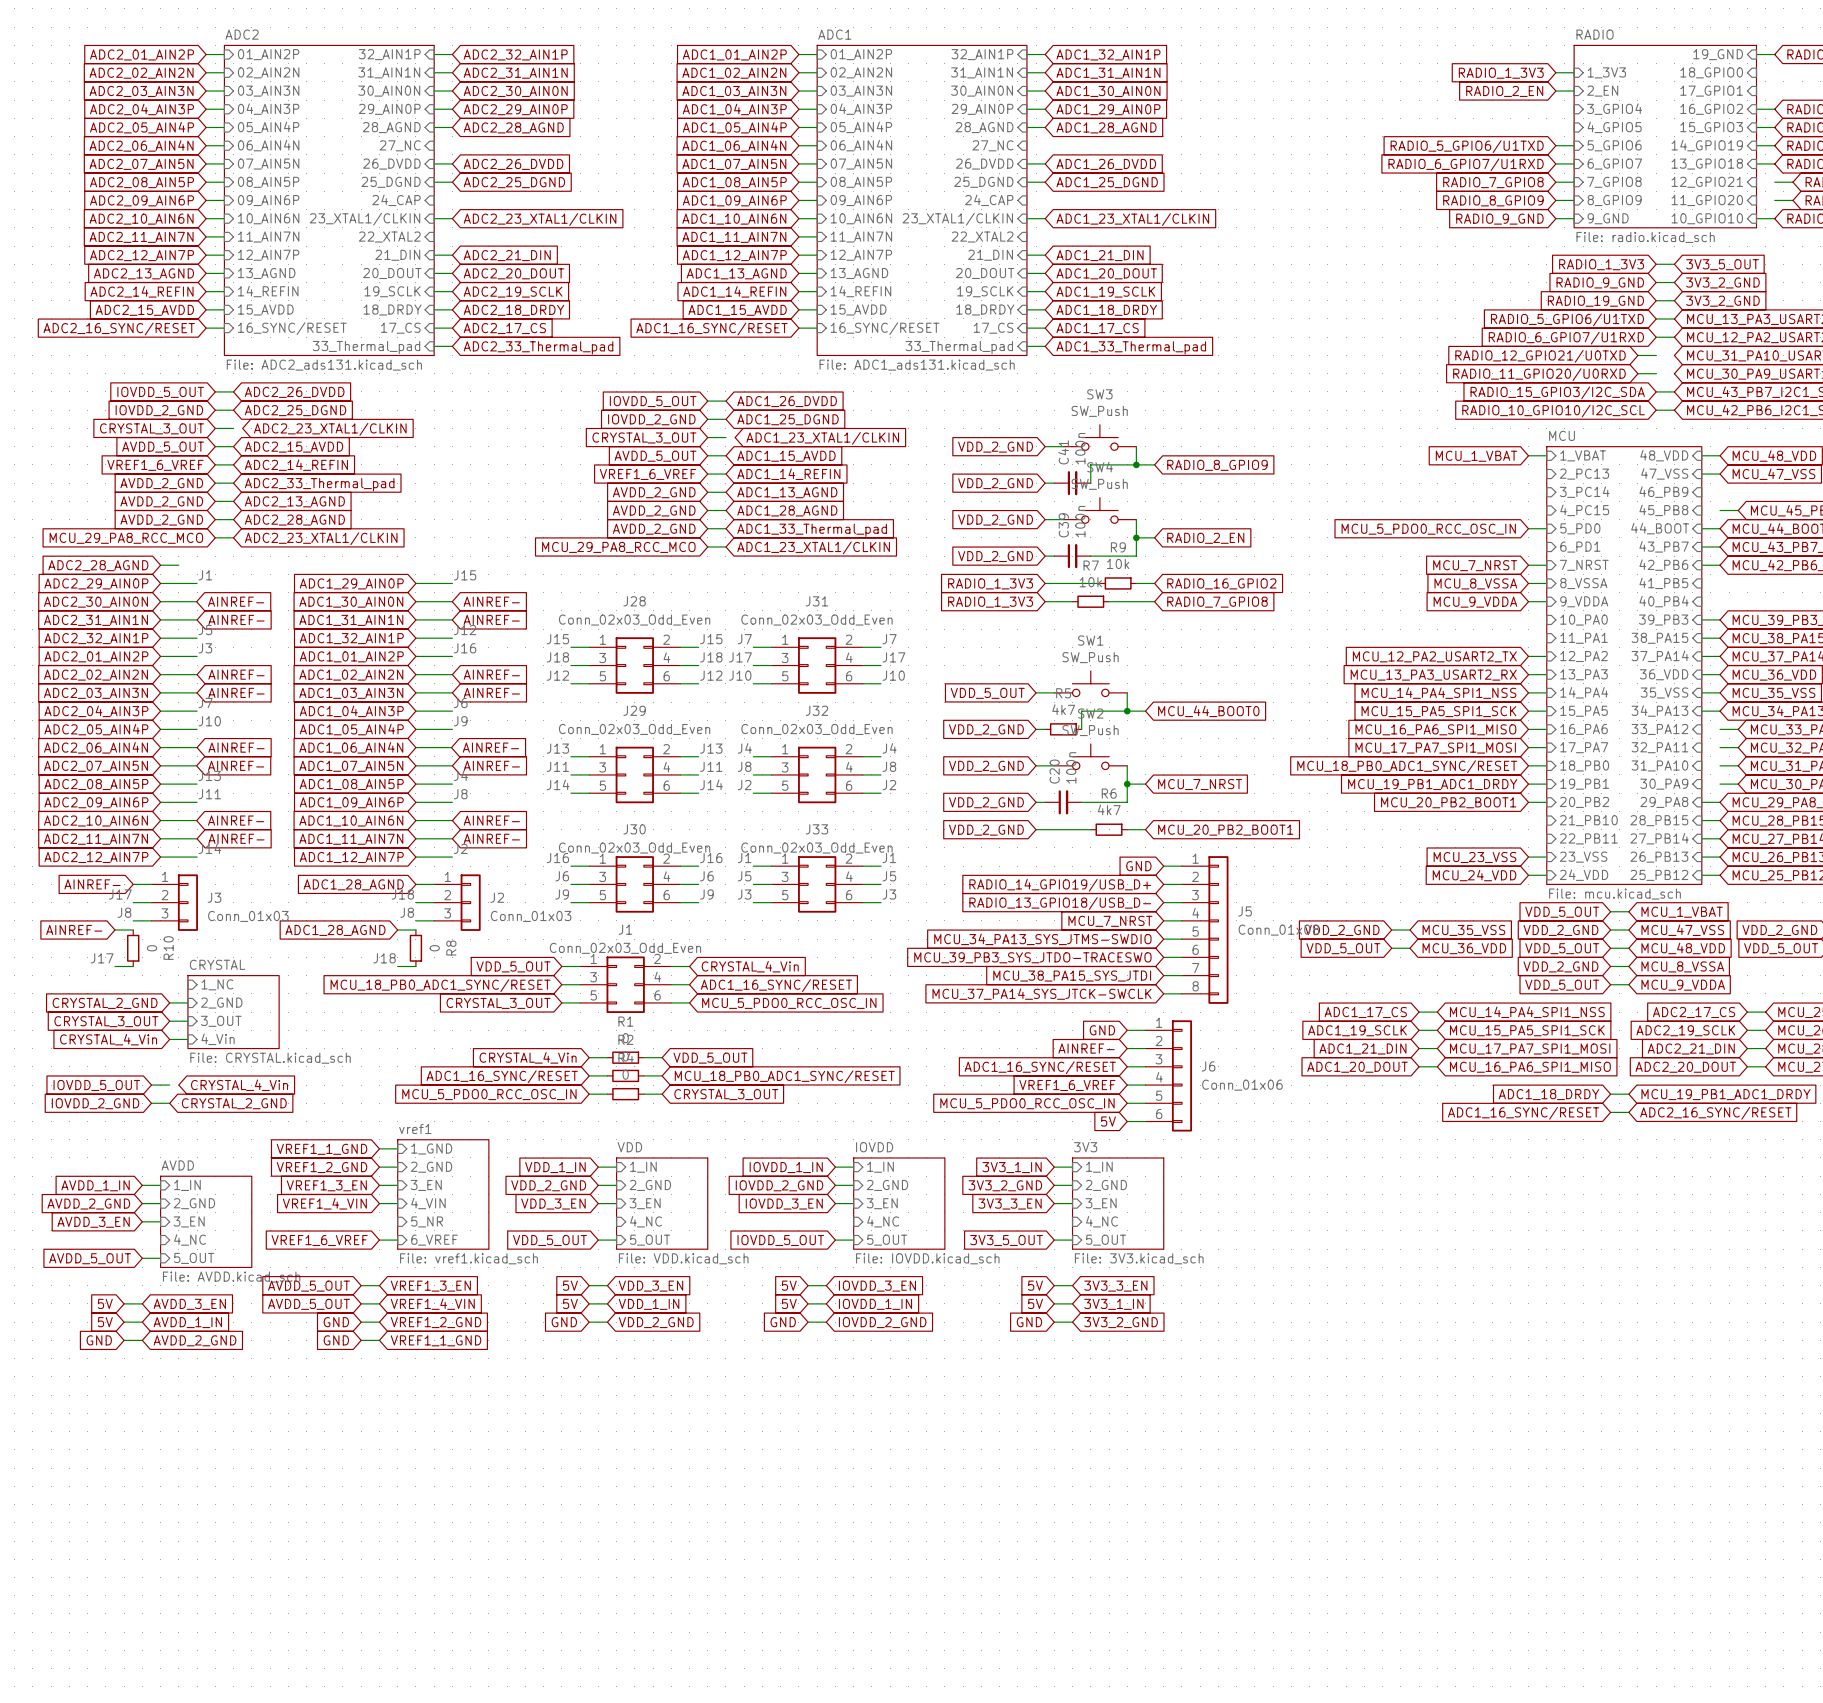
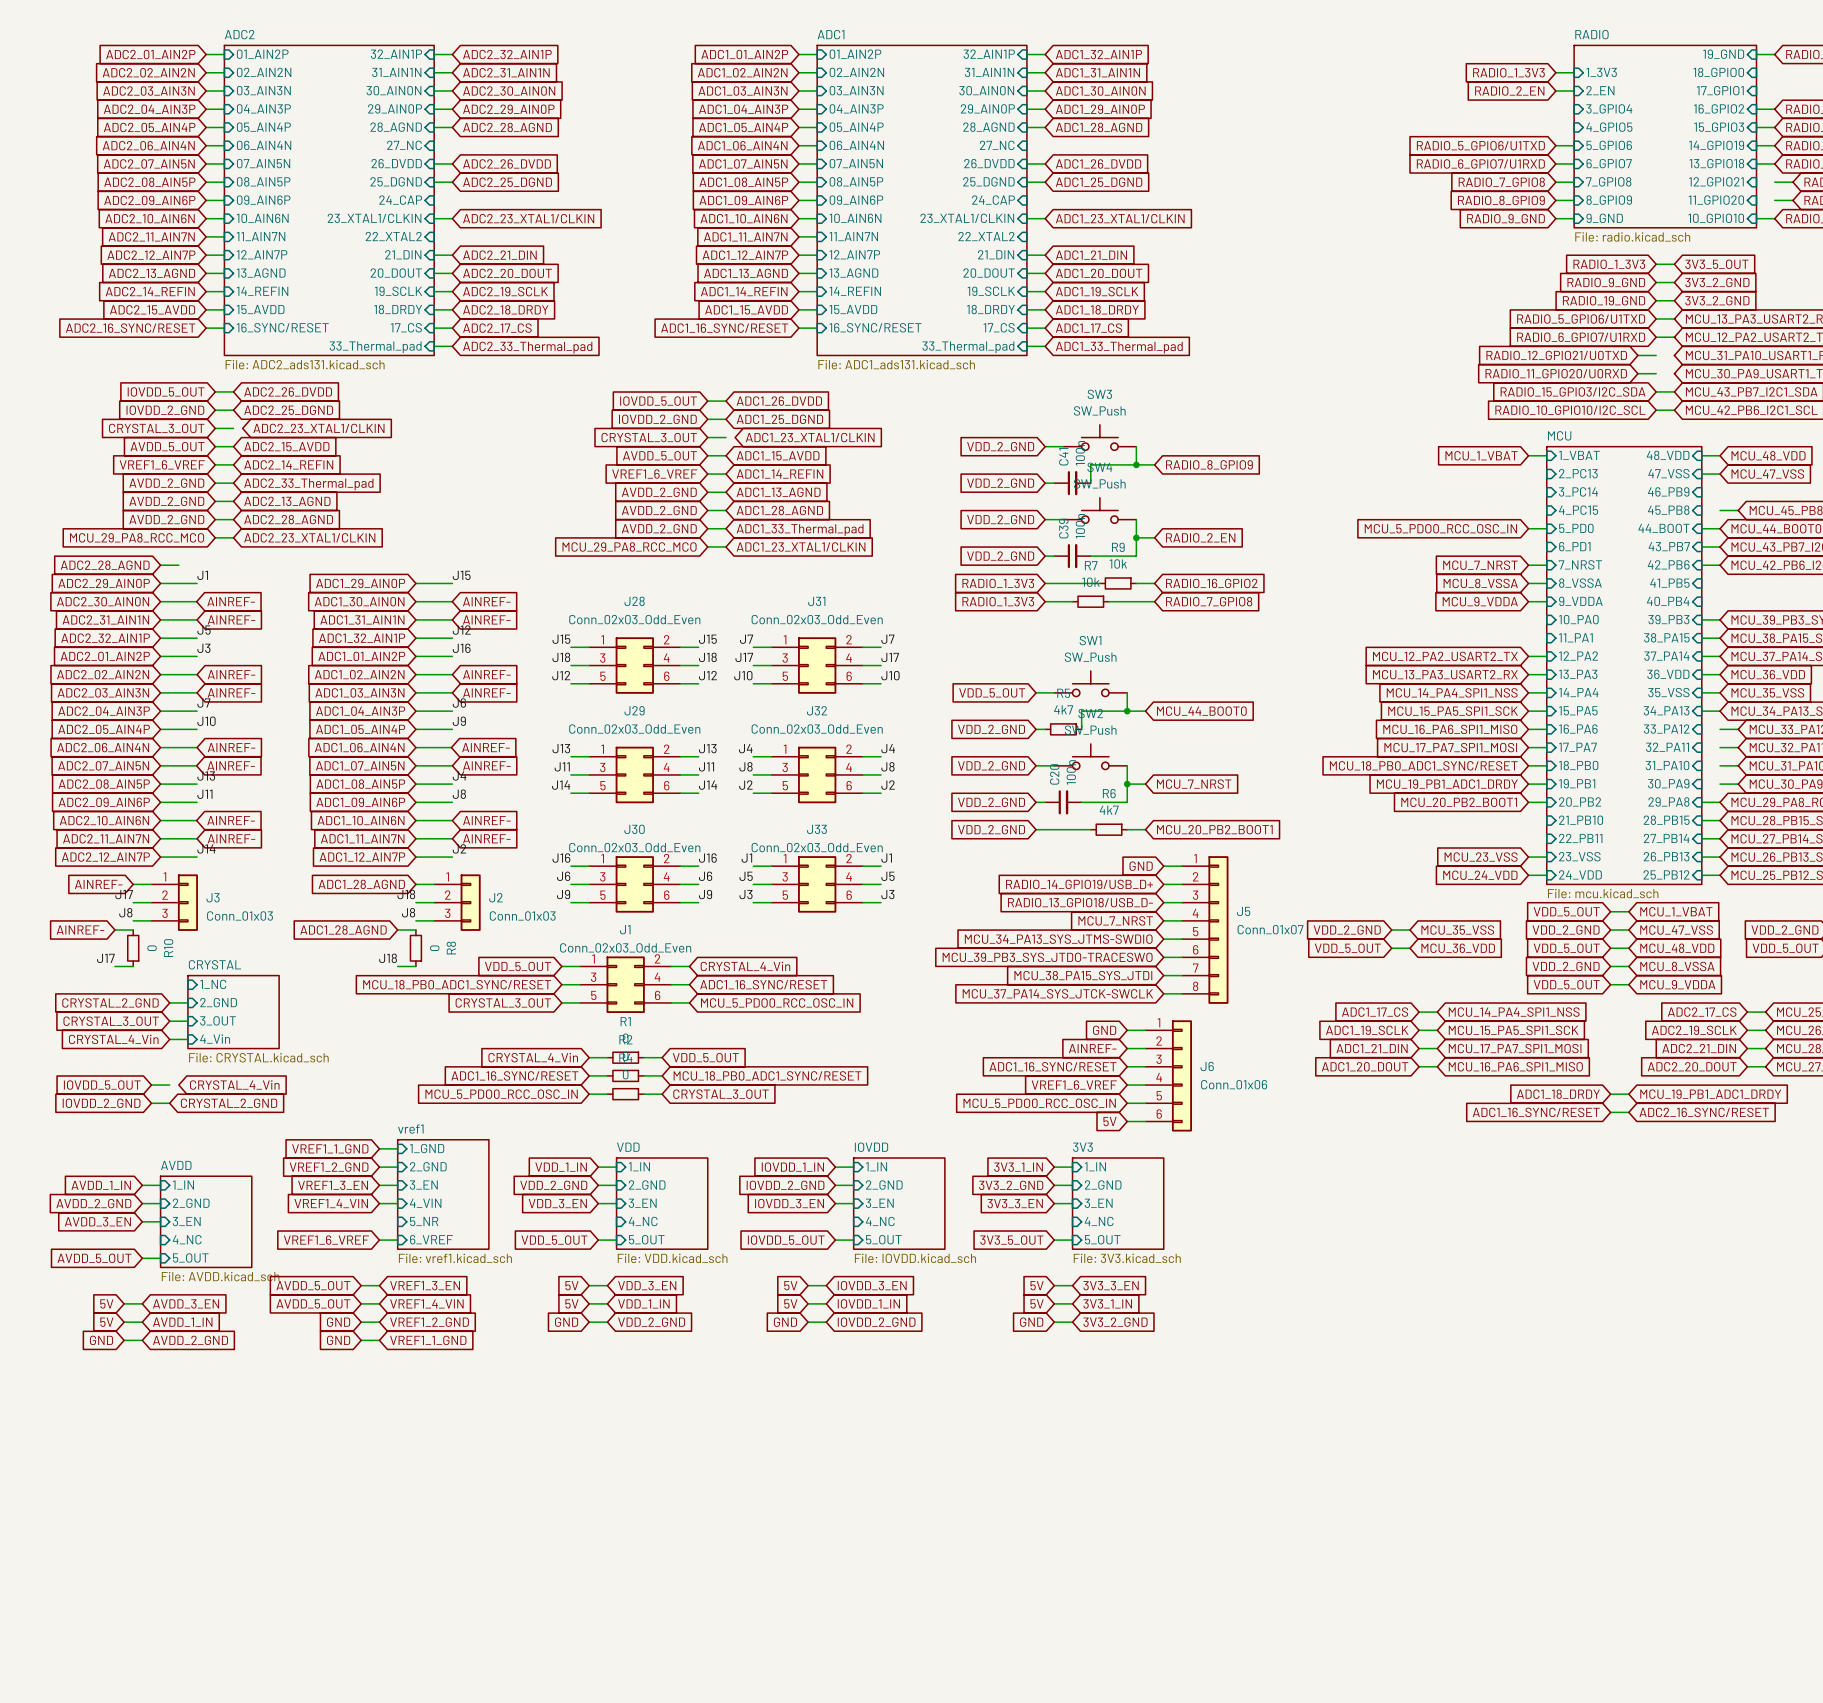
J5 value: Conn_01x08 (1278, 930) -> Conn_01x07 (1270, 929)

